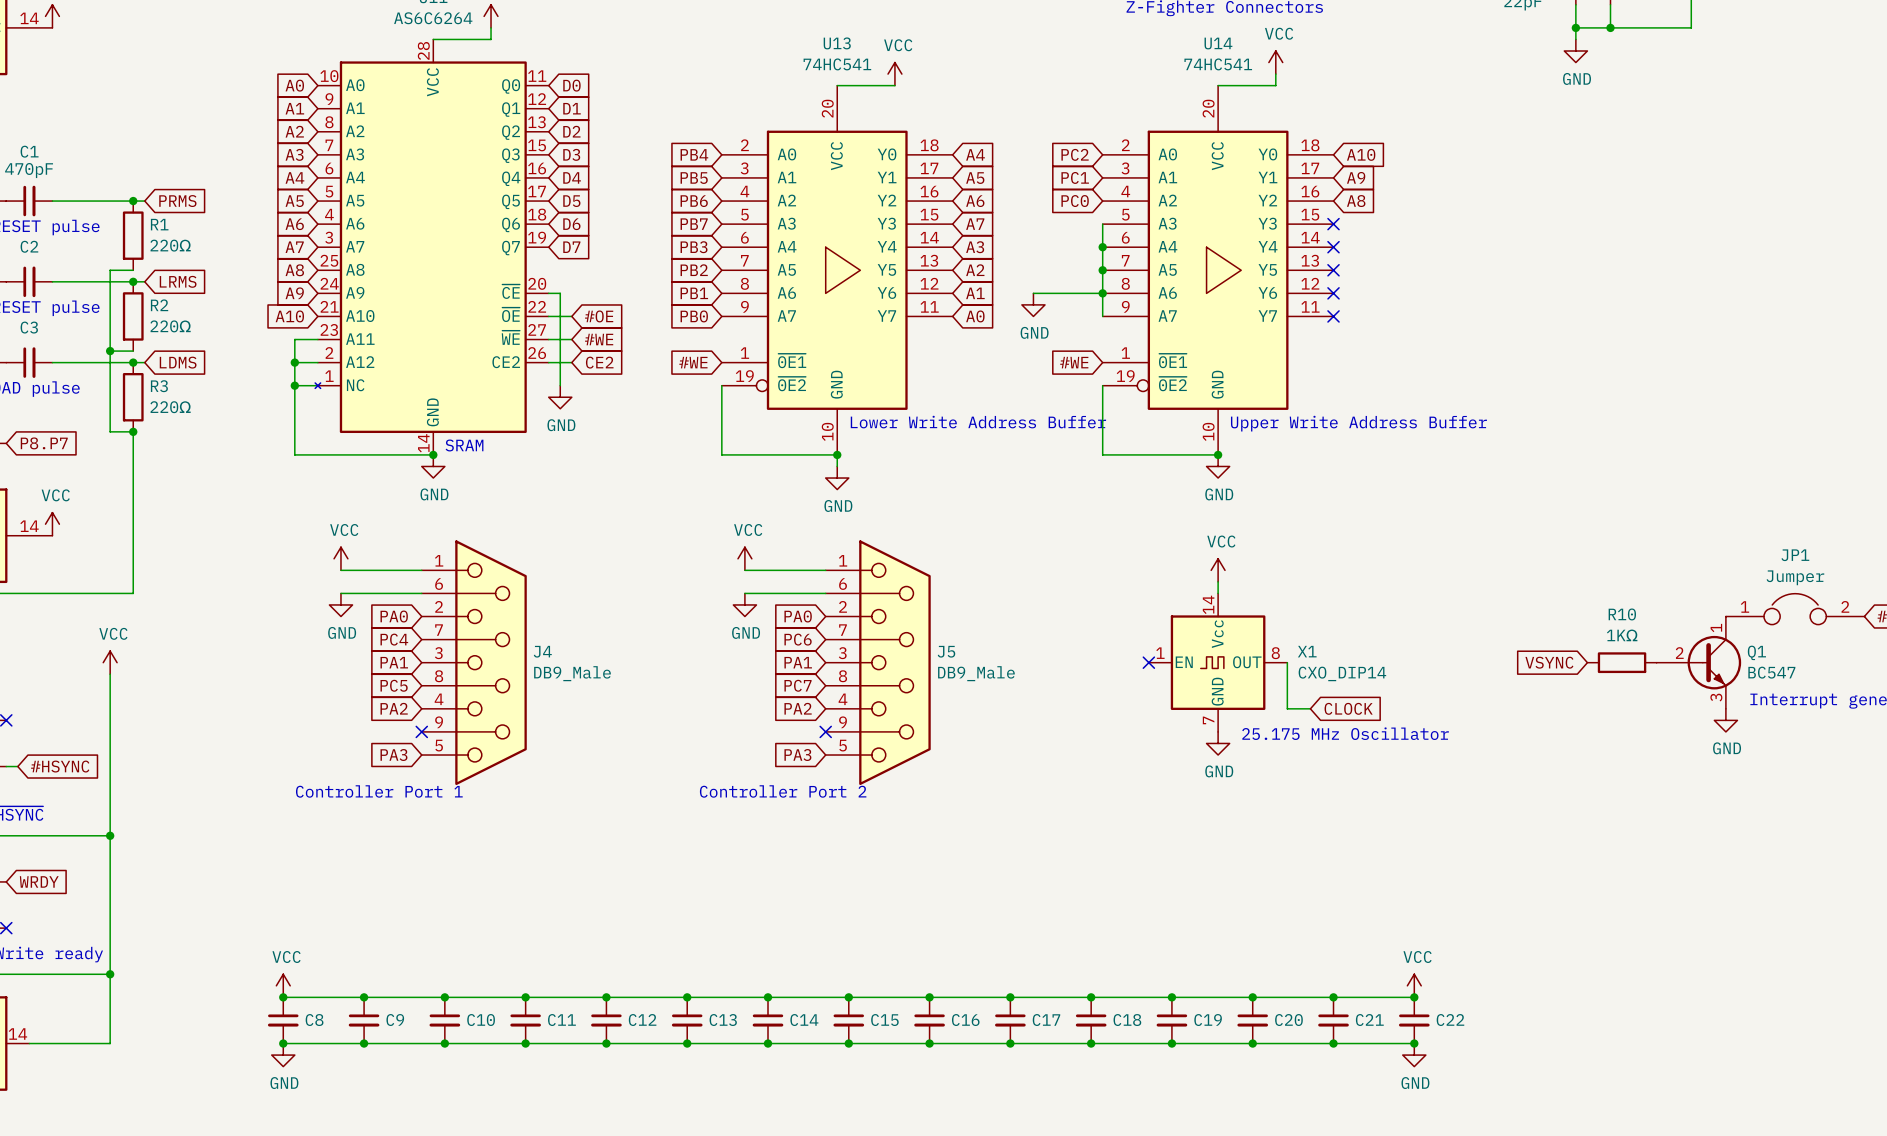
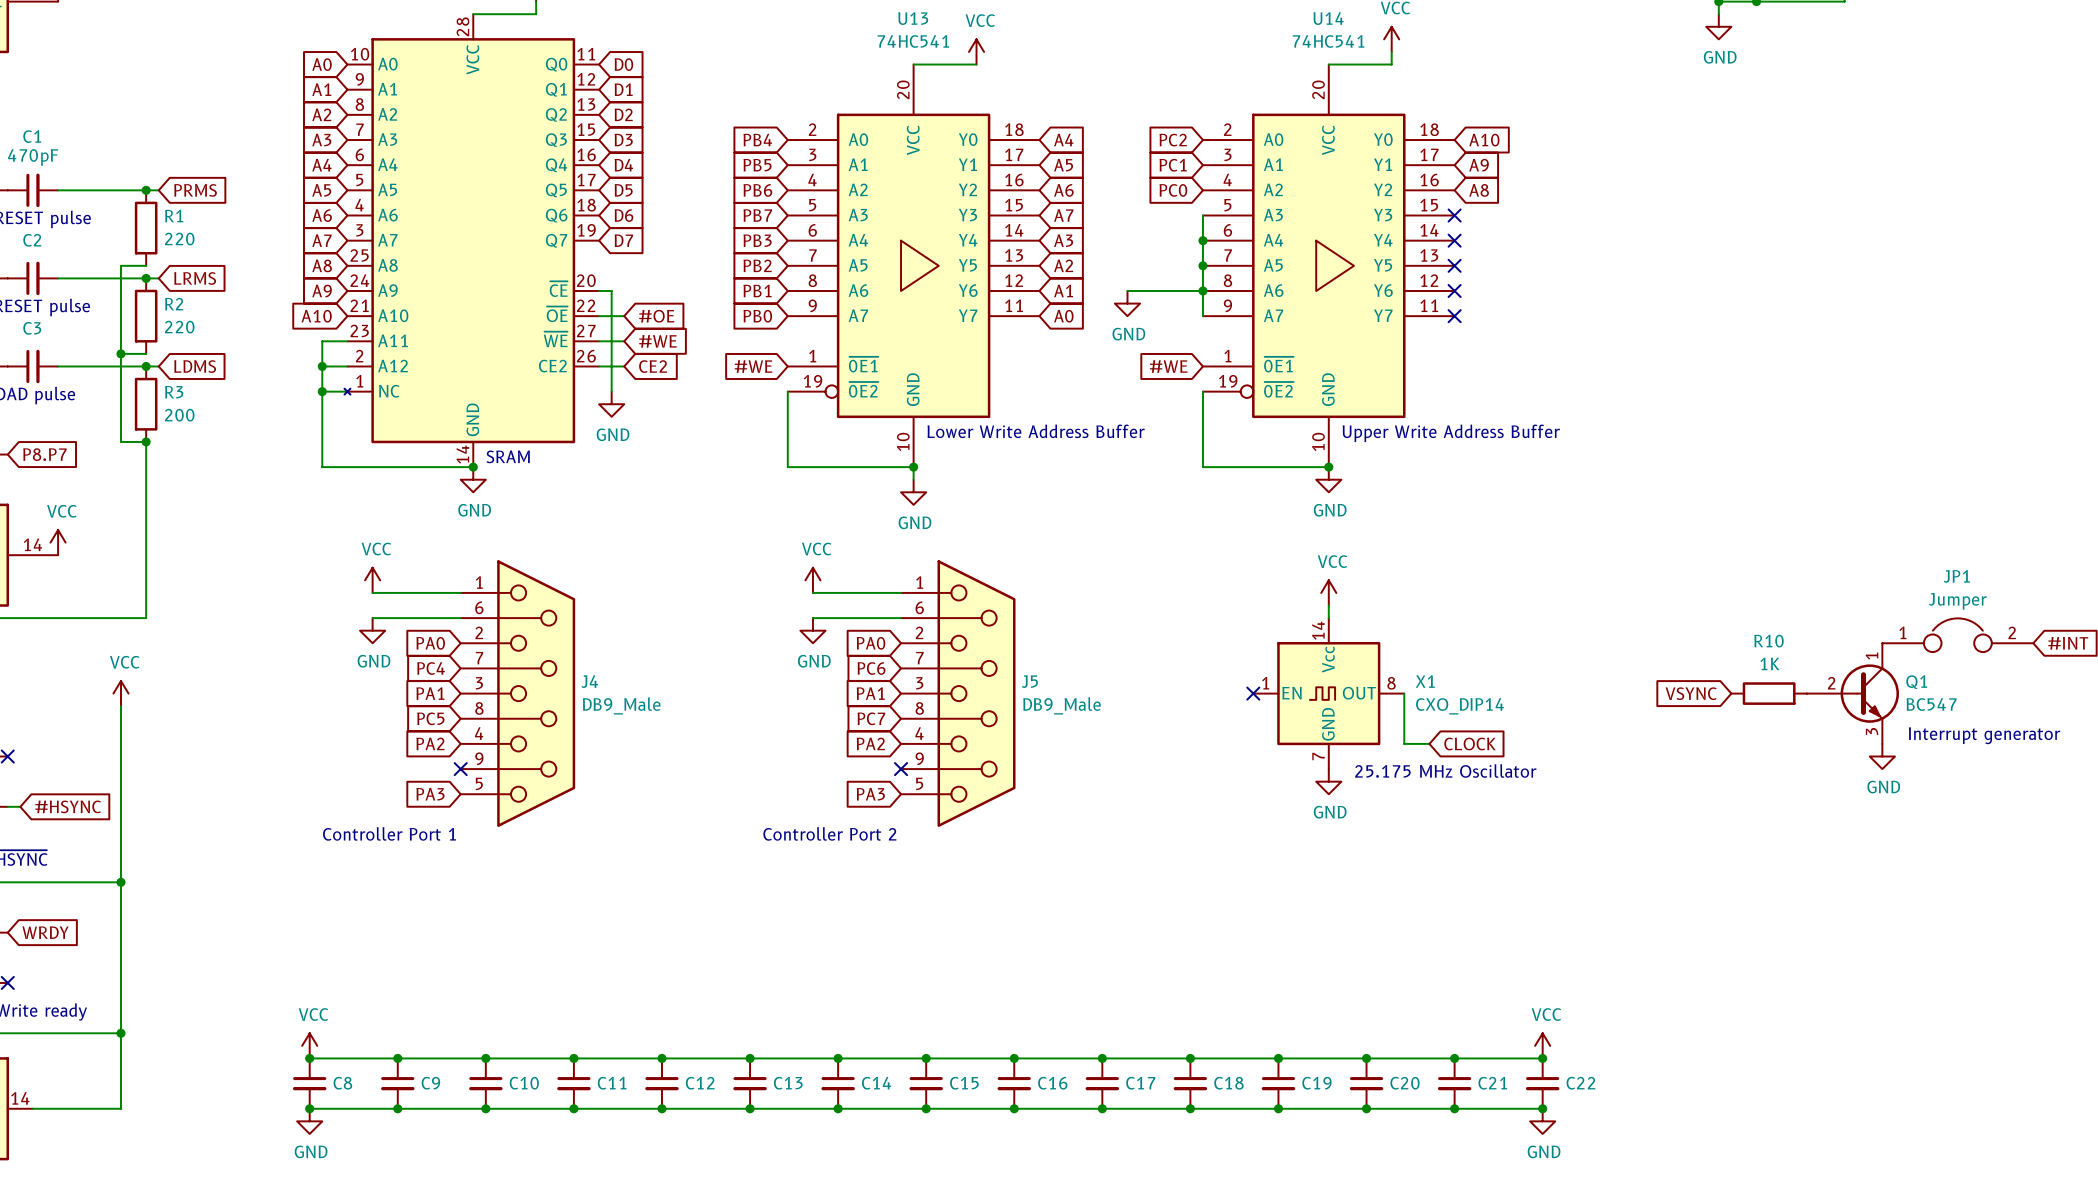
R1 value: 220Ω (170, 245) -> 220 (179, 239)
R2 value: 220Ω (170, 326) -> 220 (179, 327)
R3 value: 220Ω (170, 407) -> 200 (179, 415)
R10 value: 1KΩ (1622, 635) -> 1K (1769, 663)

